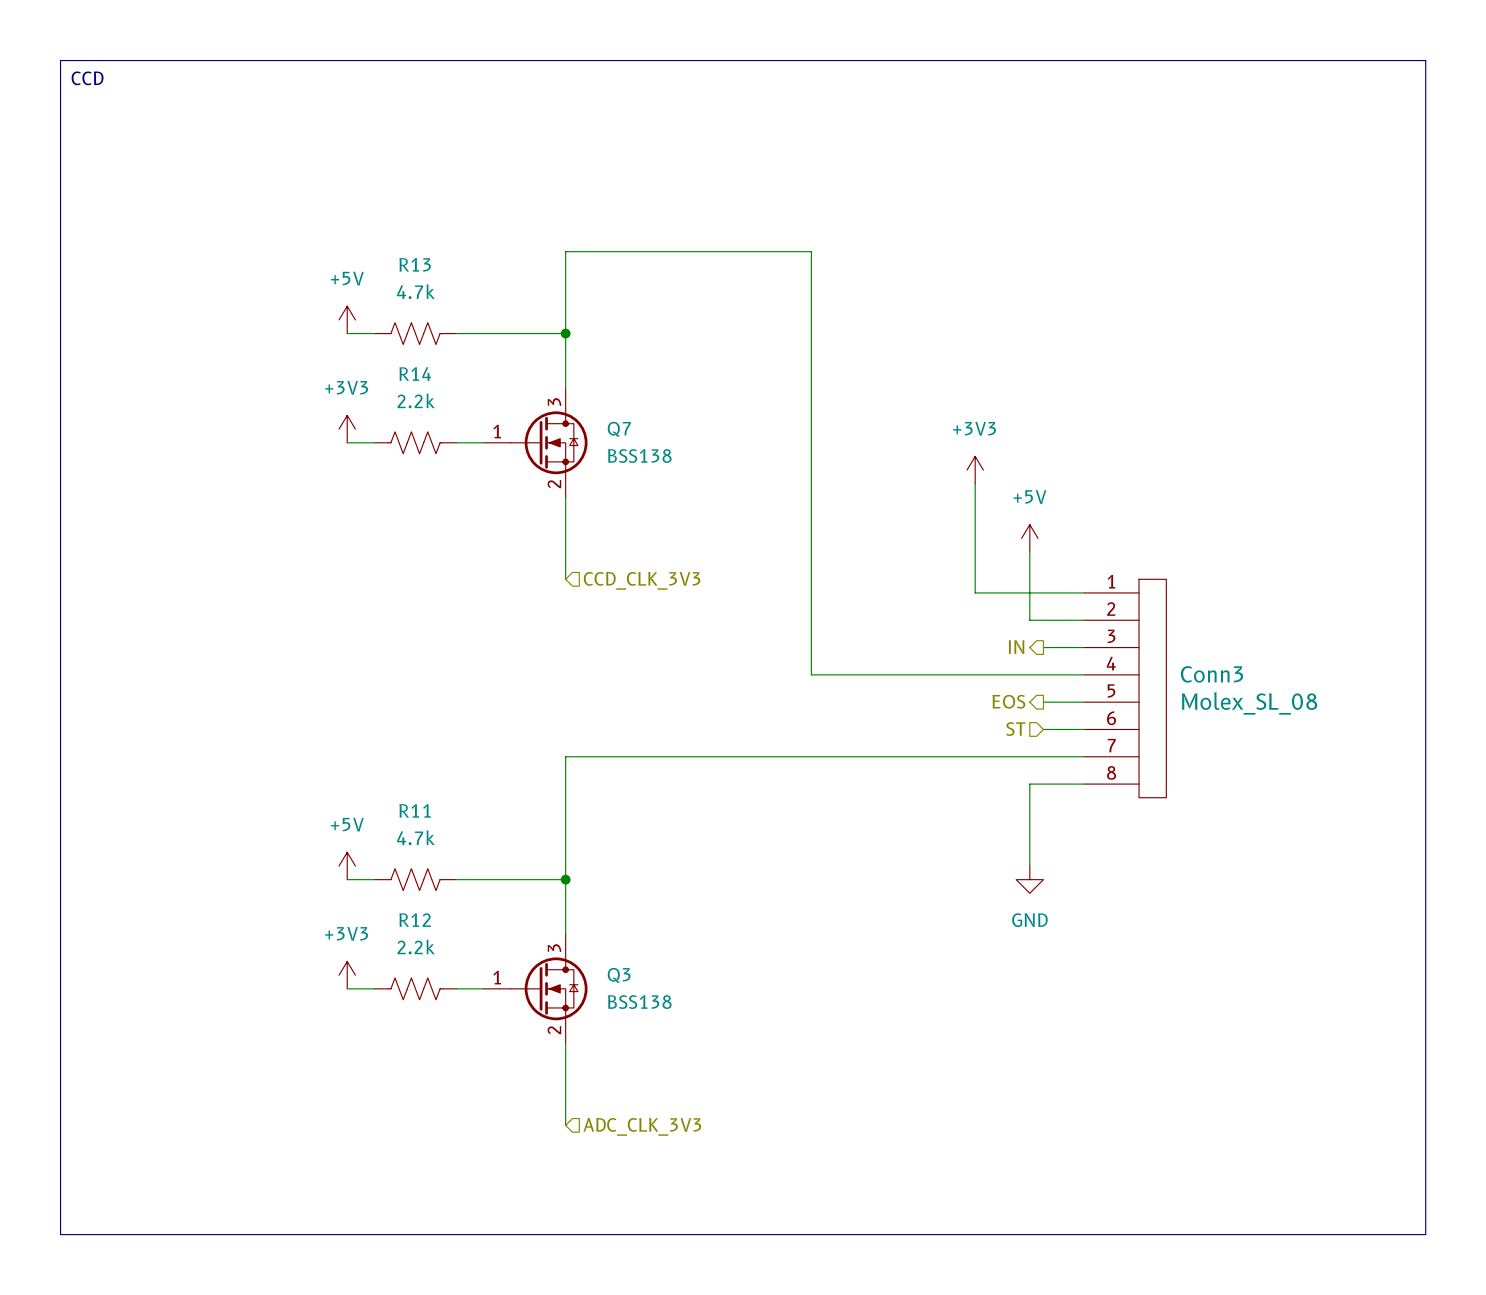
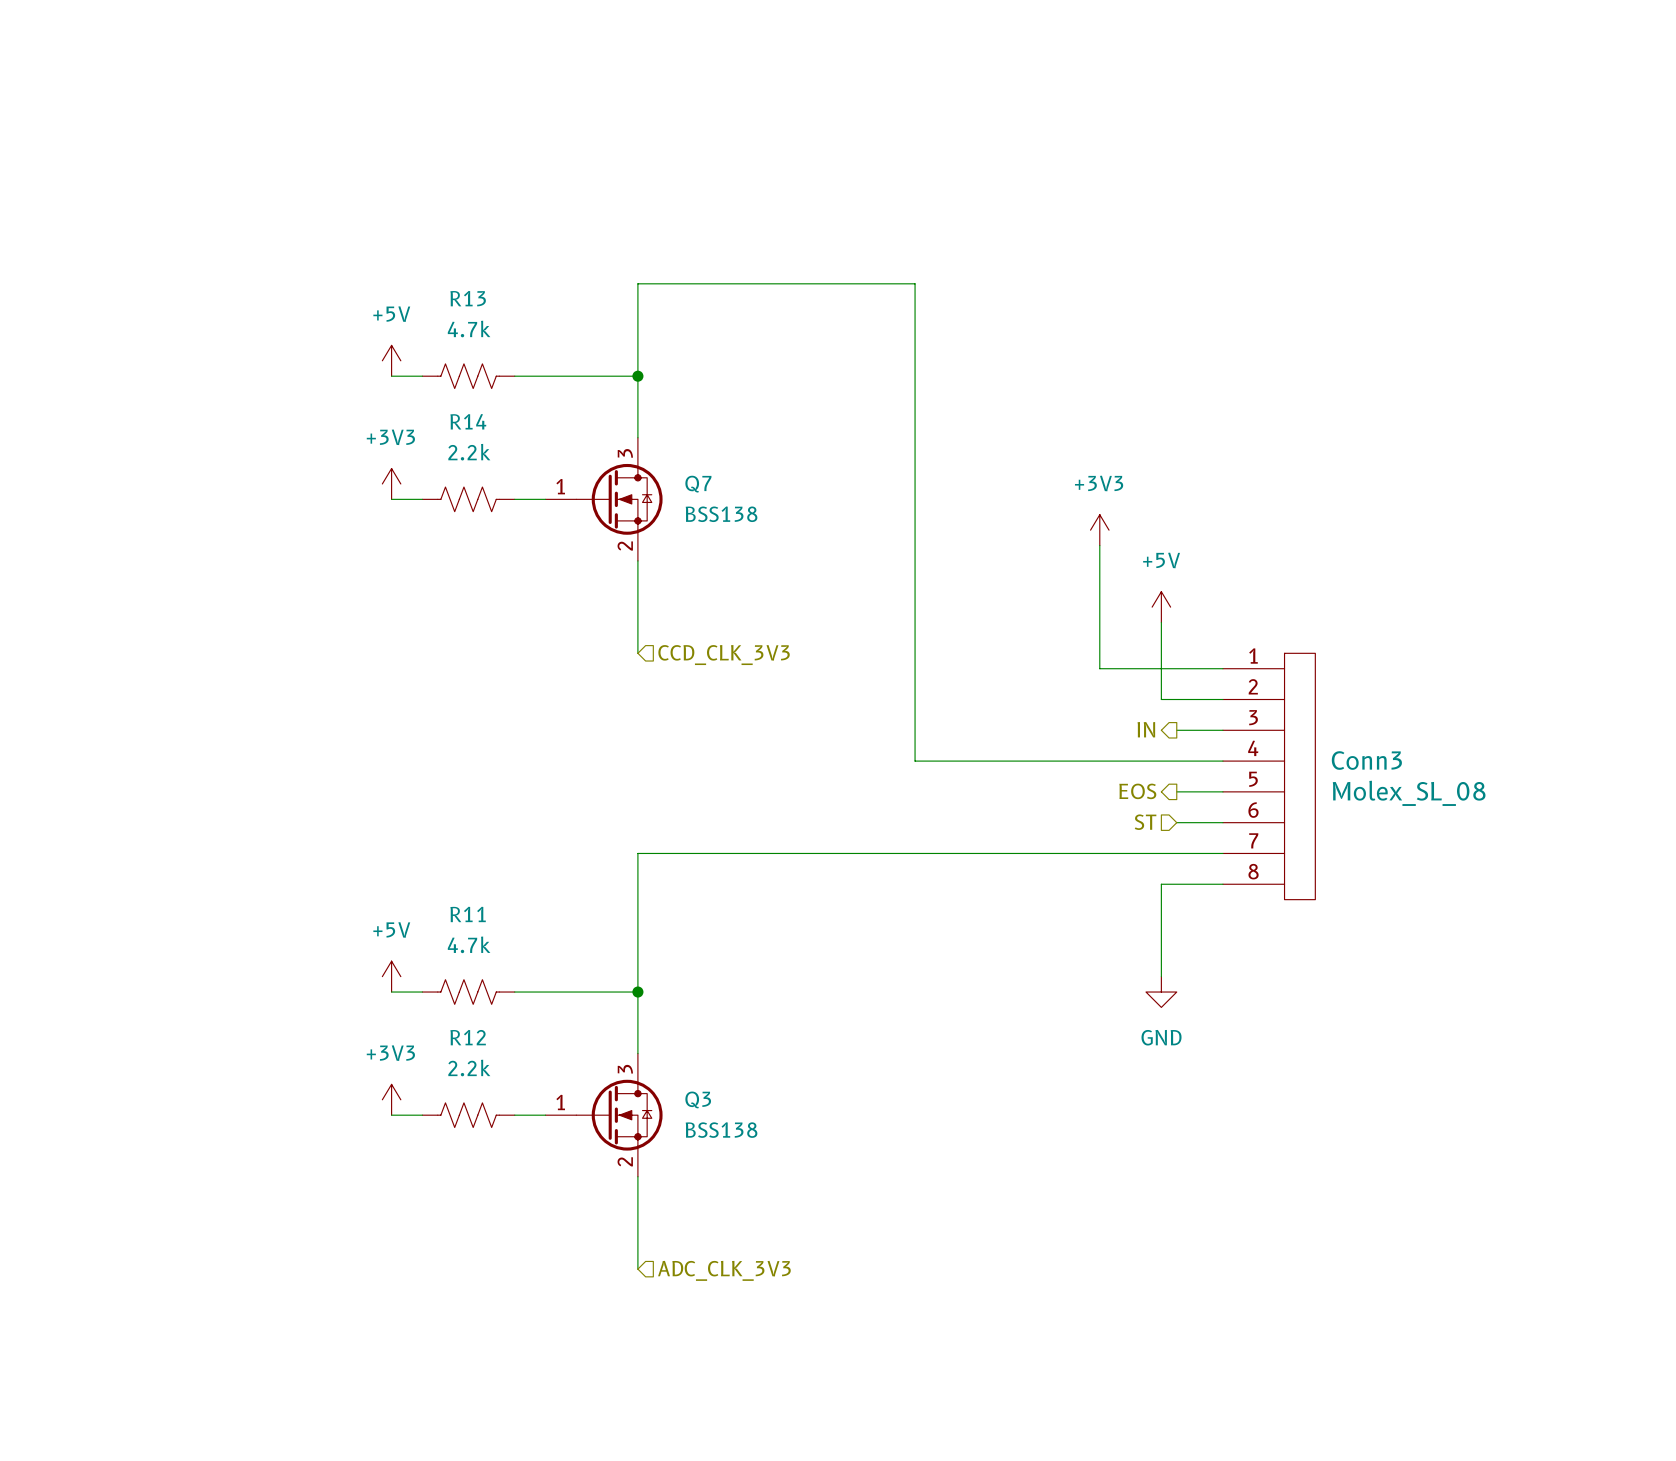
line: (60, 60) (1425, 60) (1425, 1234) (60, 1234) (60, 60) -> none
text: CCD (87, 78) -> none

